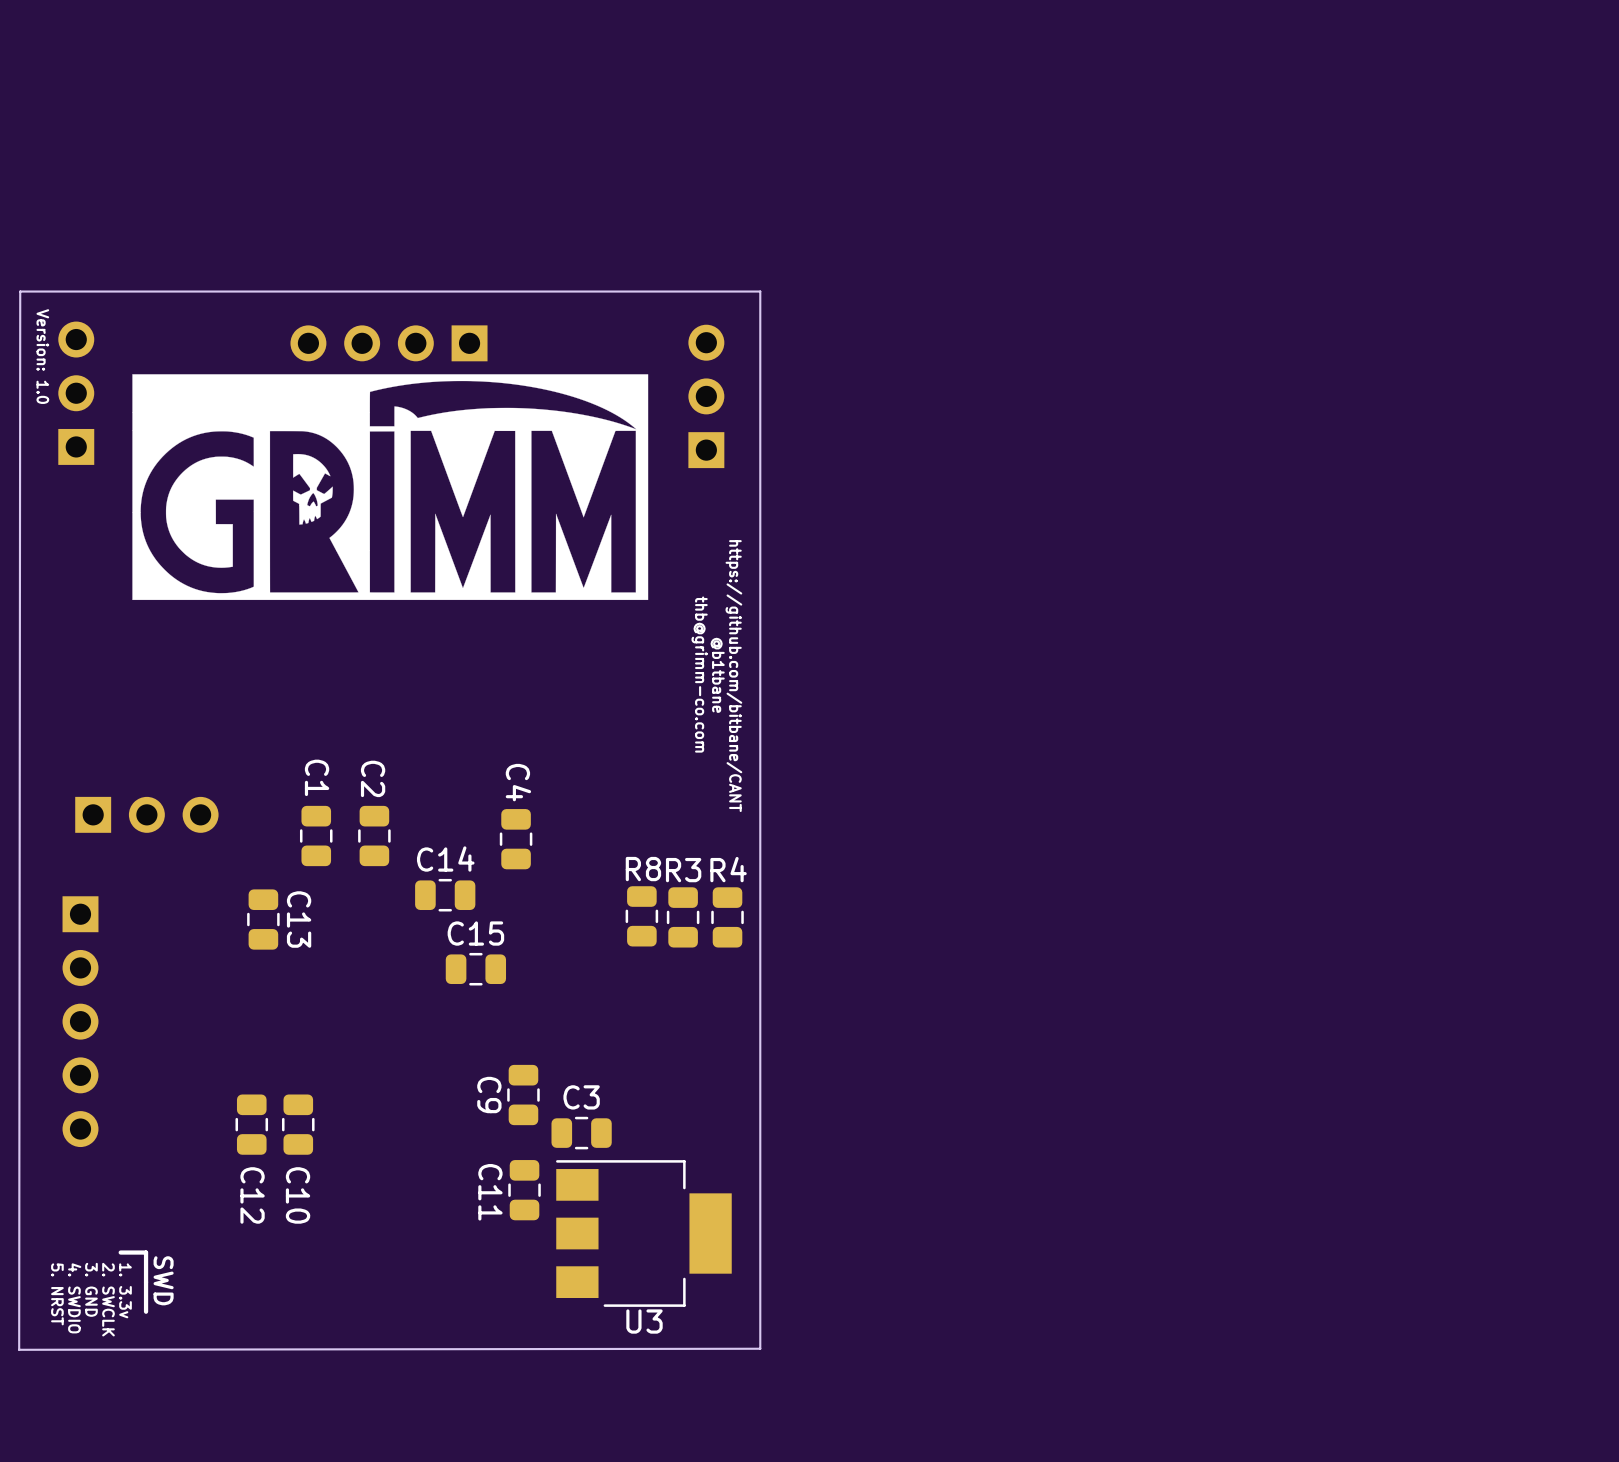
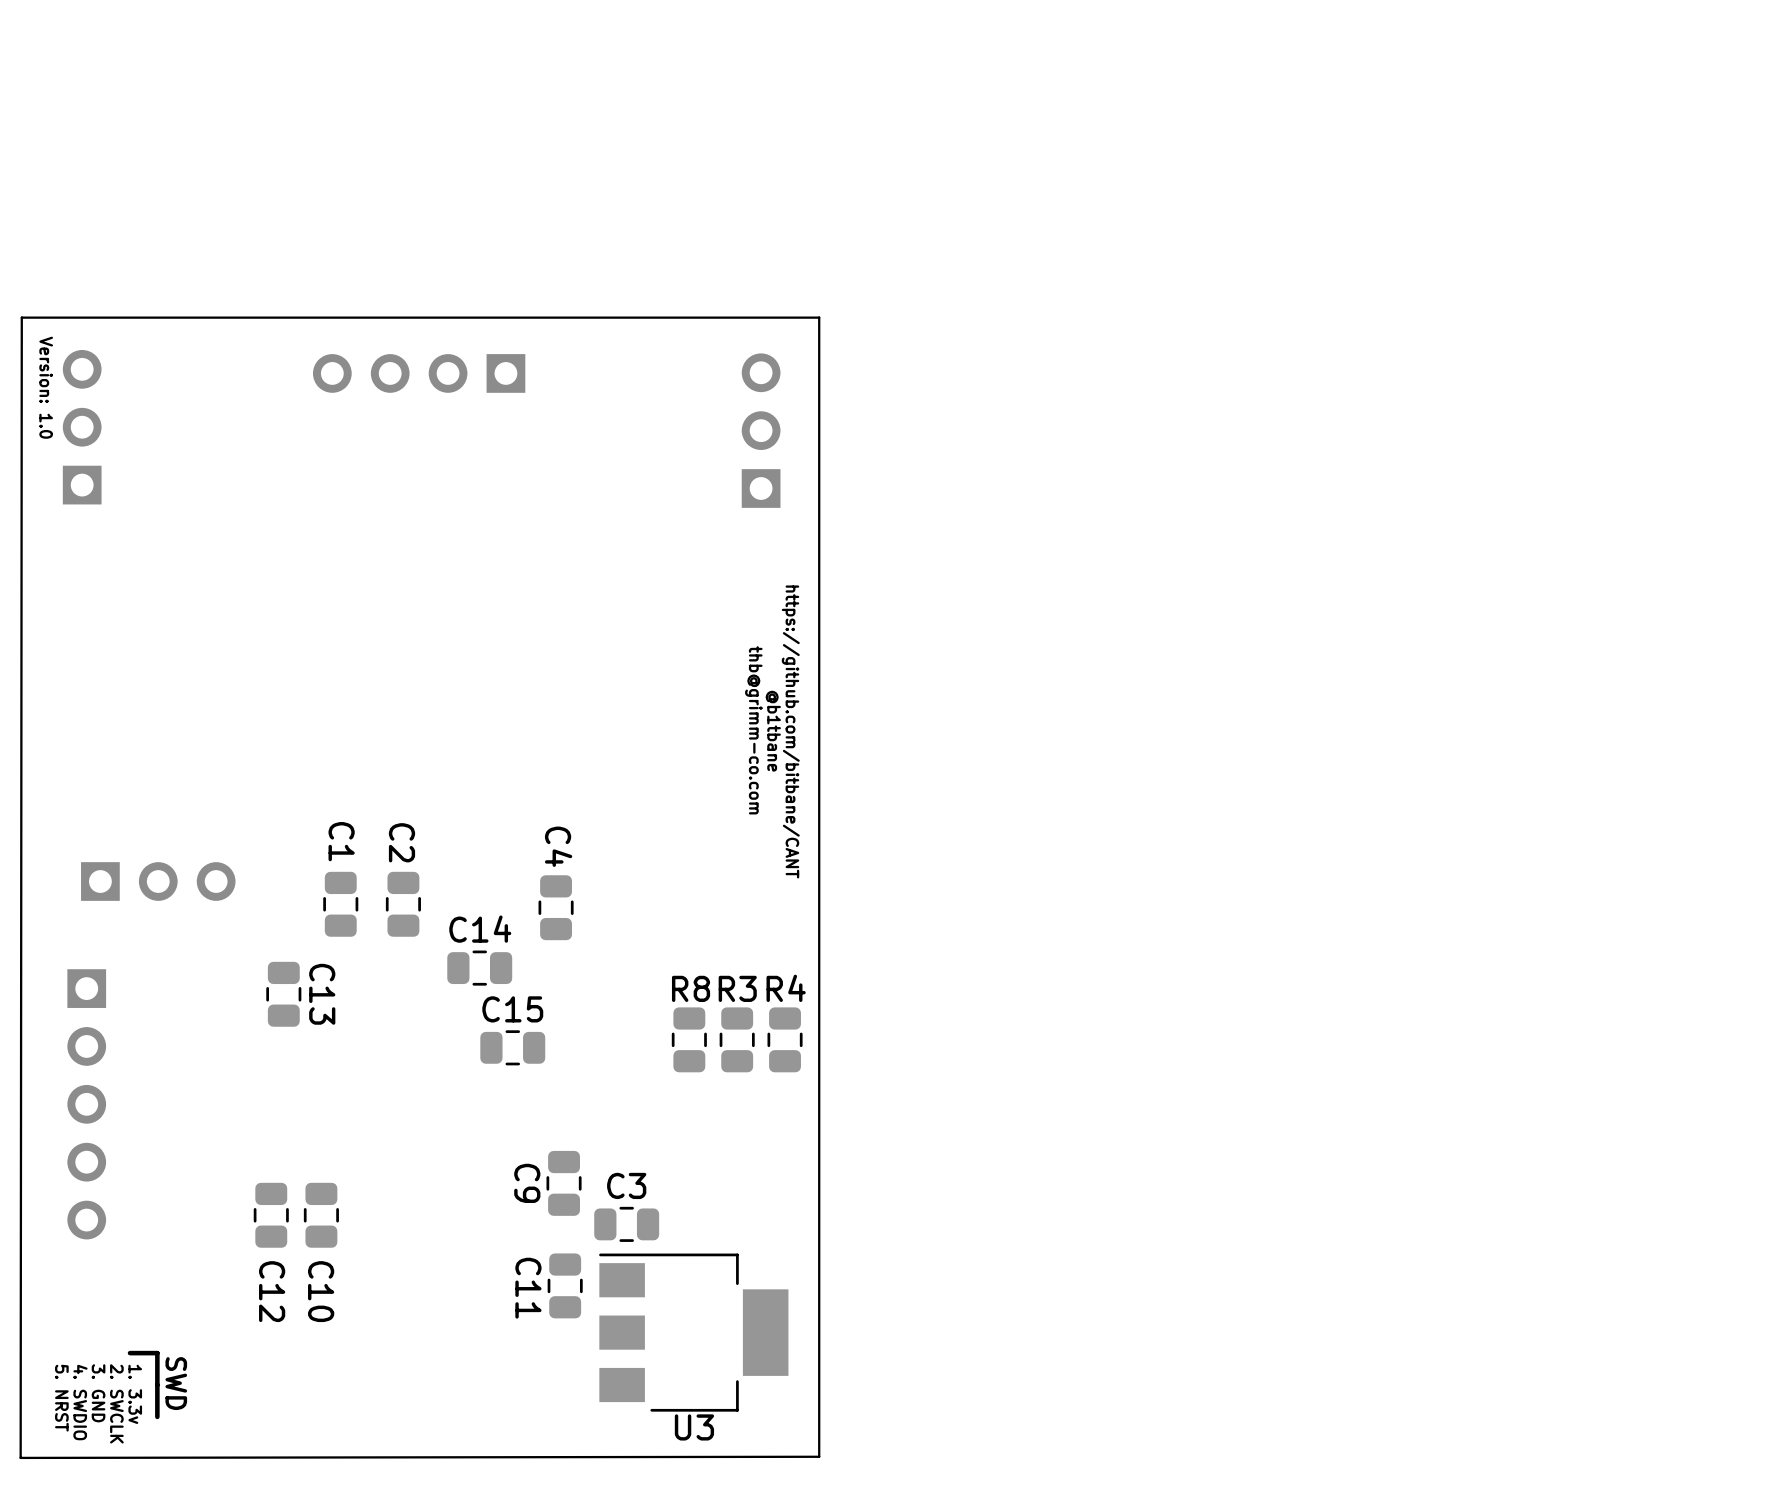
drawing: [132, 374, 649, 601] -> none
R8 position: (641, 916) -> (689, 1039)
R3 position: (683, 917) -> (737, 1039)
R4 position: (727, 917) -> (785, 1039)

